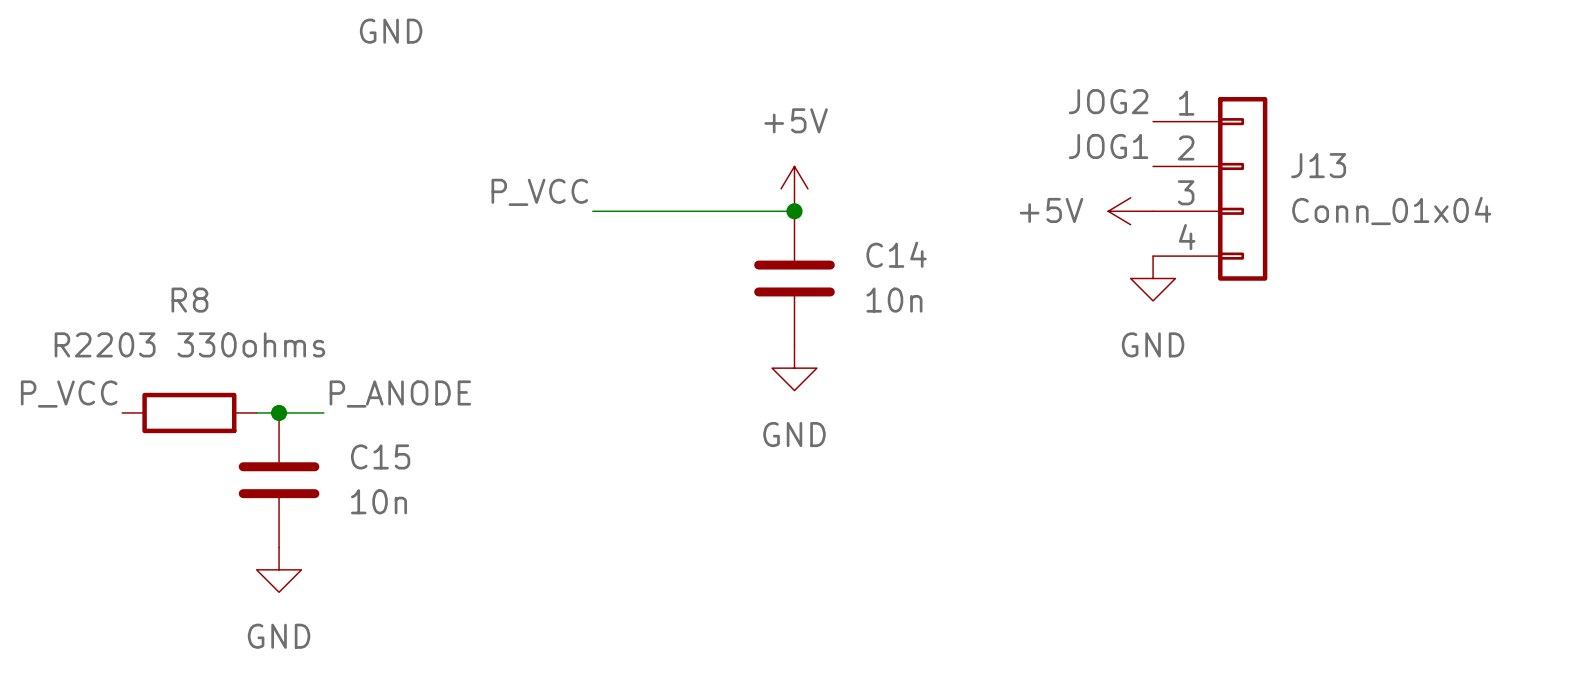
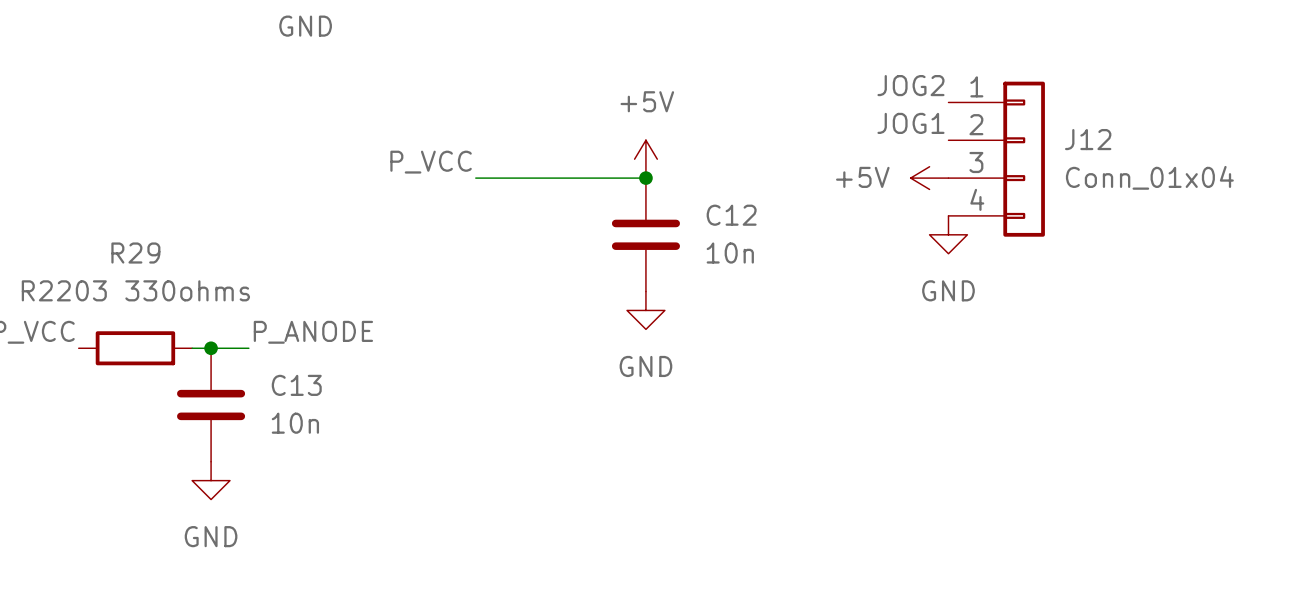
J13 name: J13 (1318, 165) -> J12 (1088, 139)
C14 name: C14 (896, 254) -> C12 (731, 215)
R8 name: R8 (189, 300) -> R29 (135, 253)
C15 name: C15 (380, 456) -> C13 (296, 385)

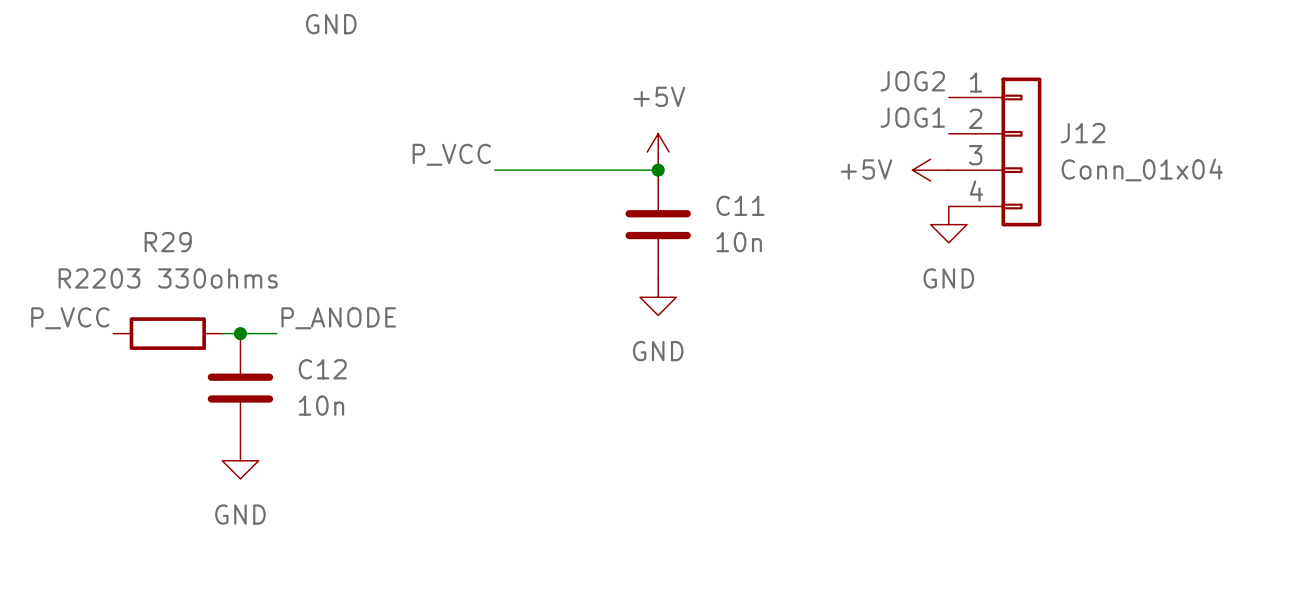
C12 name: C12 (731, 215) -> C11 (740, 205)
C13 name: C13 (296, 385) -> C12 (322, 369)

